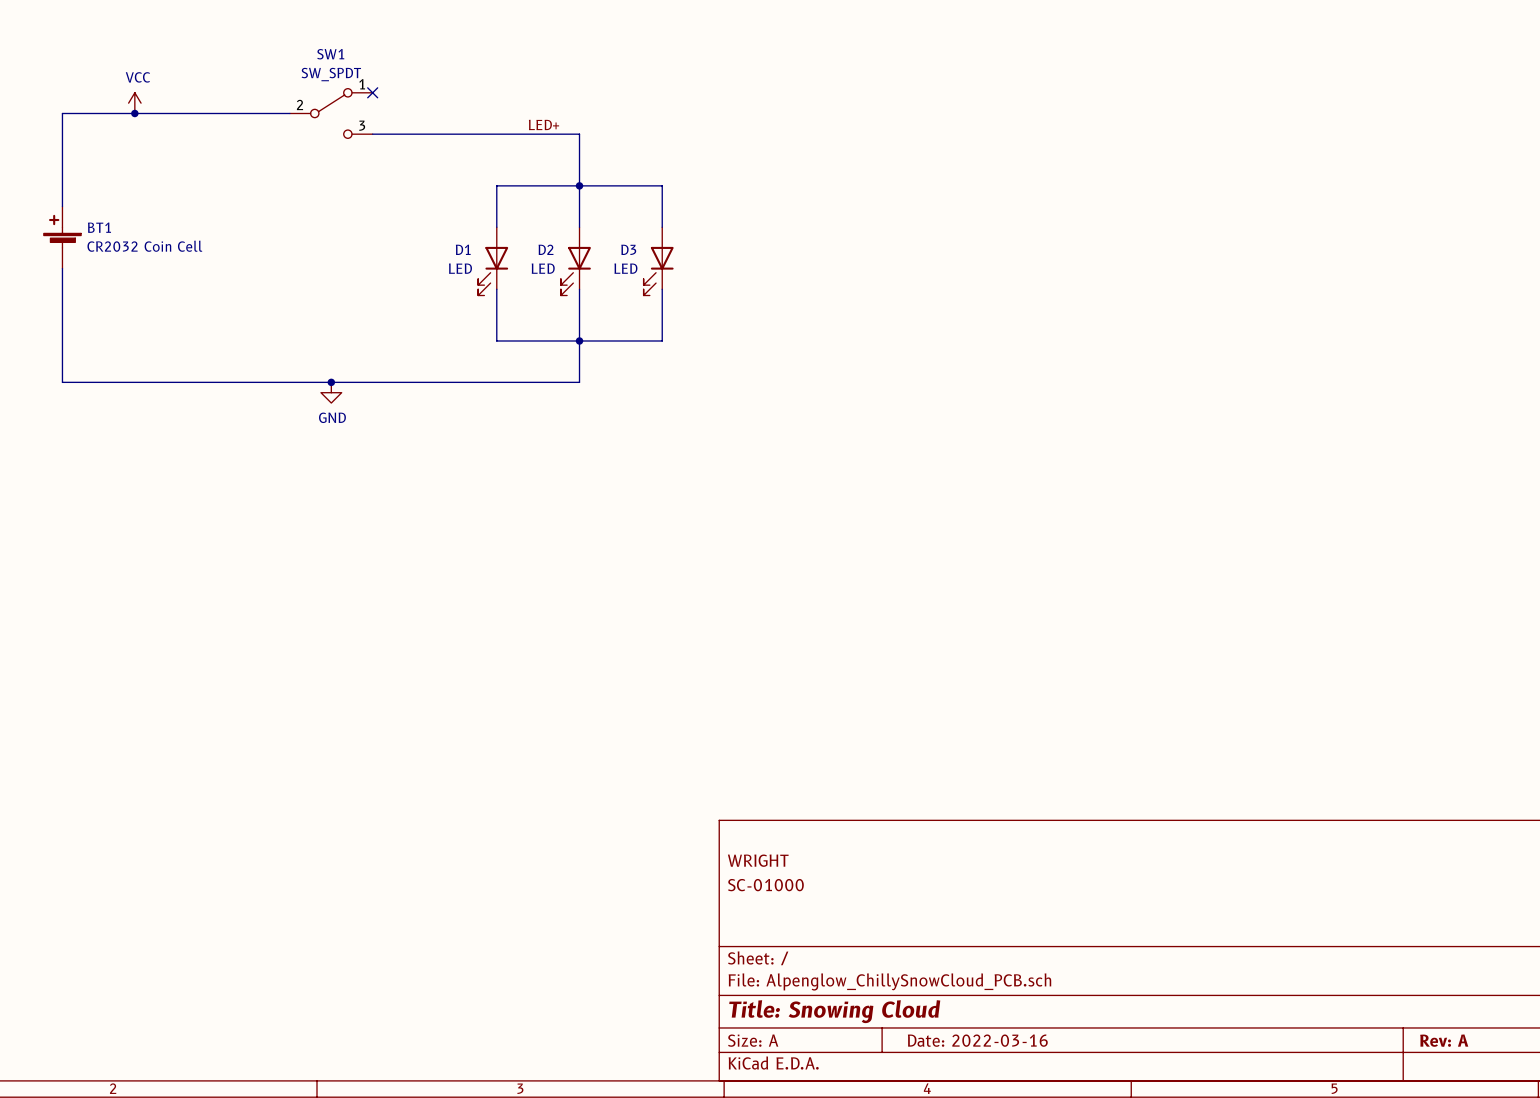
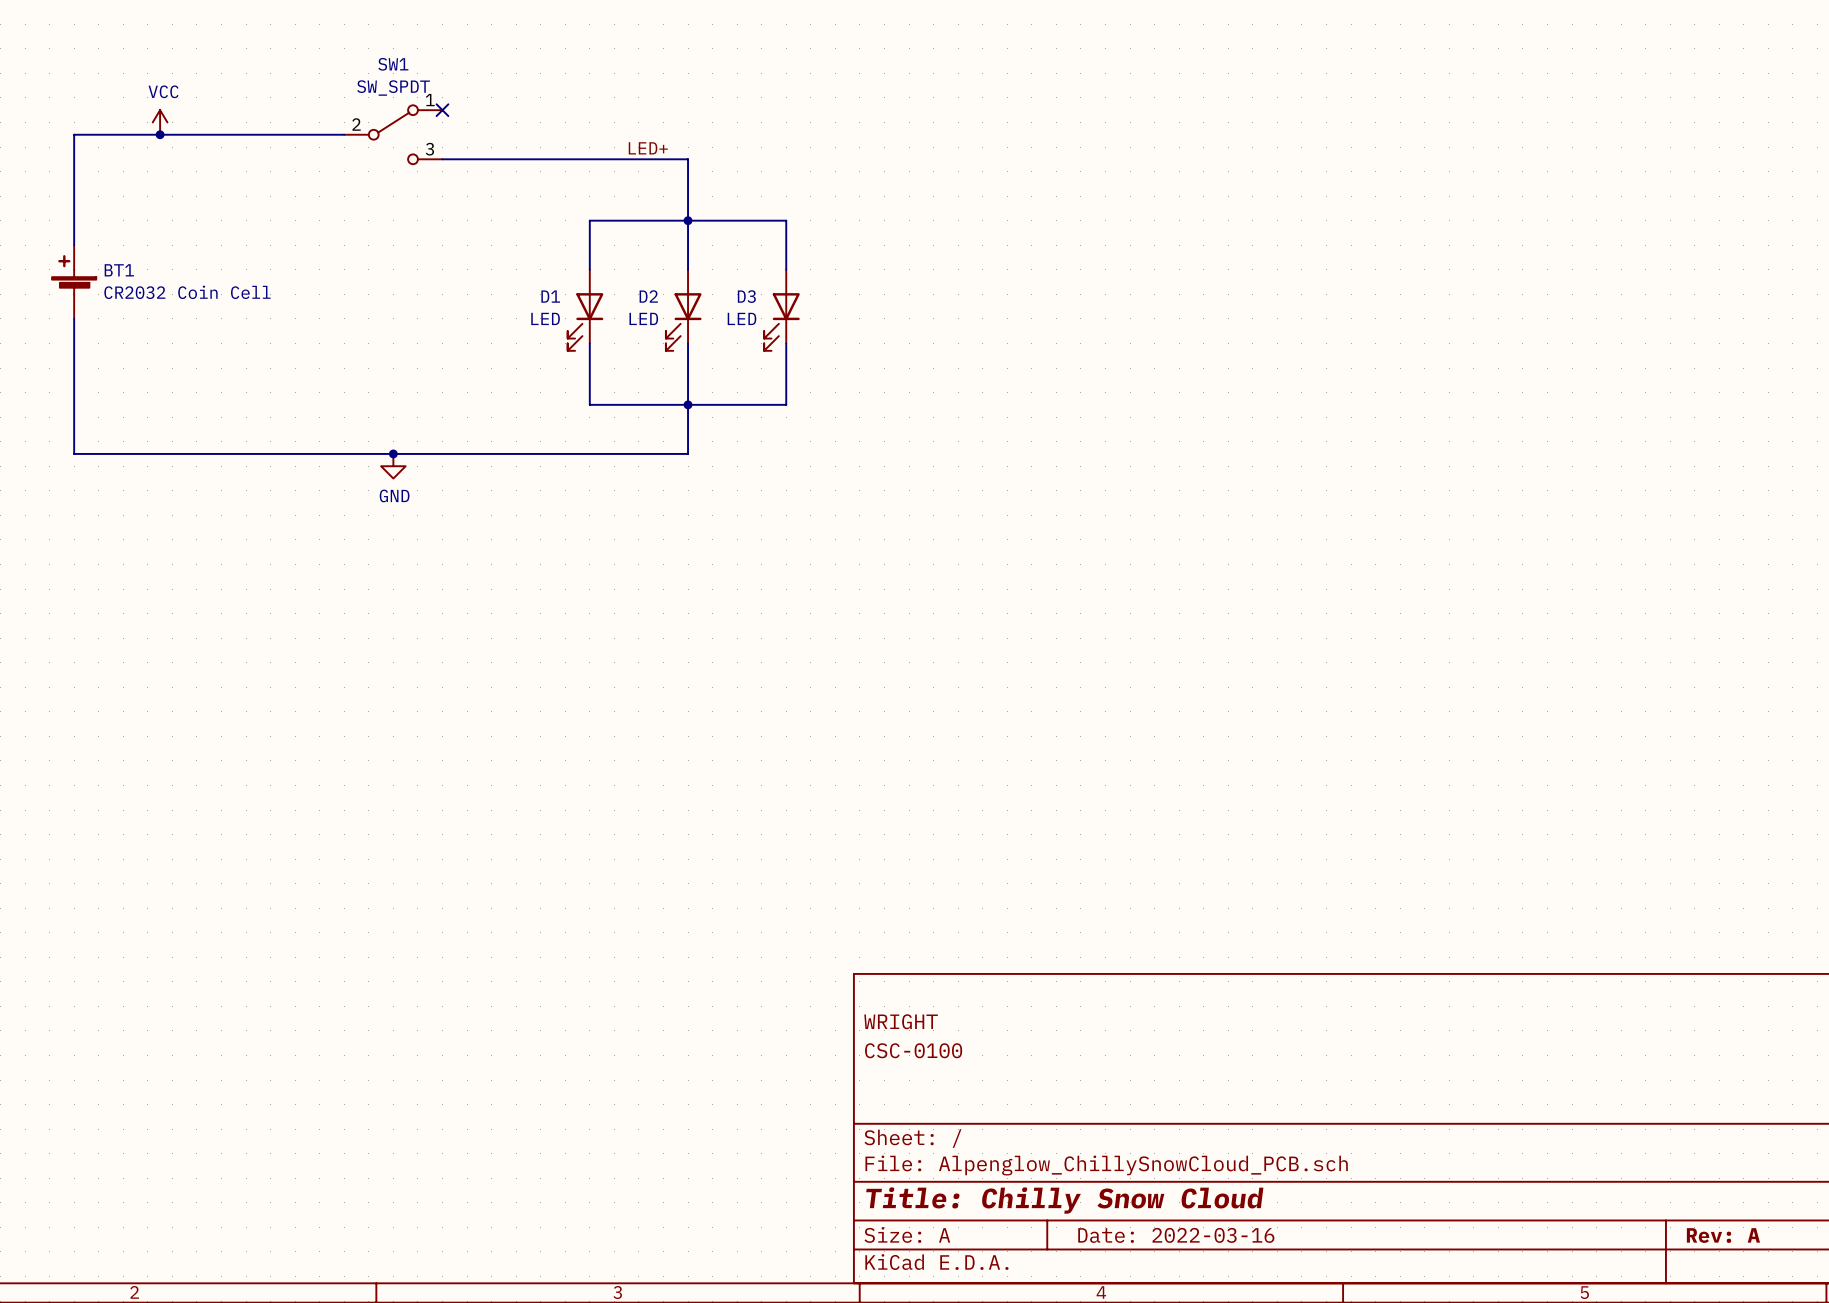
title block: SC-01000 (765, 885) -> CSC-0100 (913, 1050)
title block: Title: Snowing Cloud (834, 1011) -> Title: Chilly Snow Cloud (1064, 1200)

